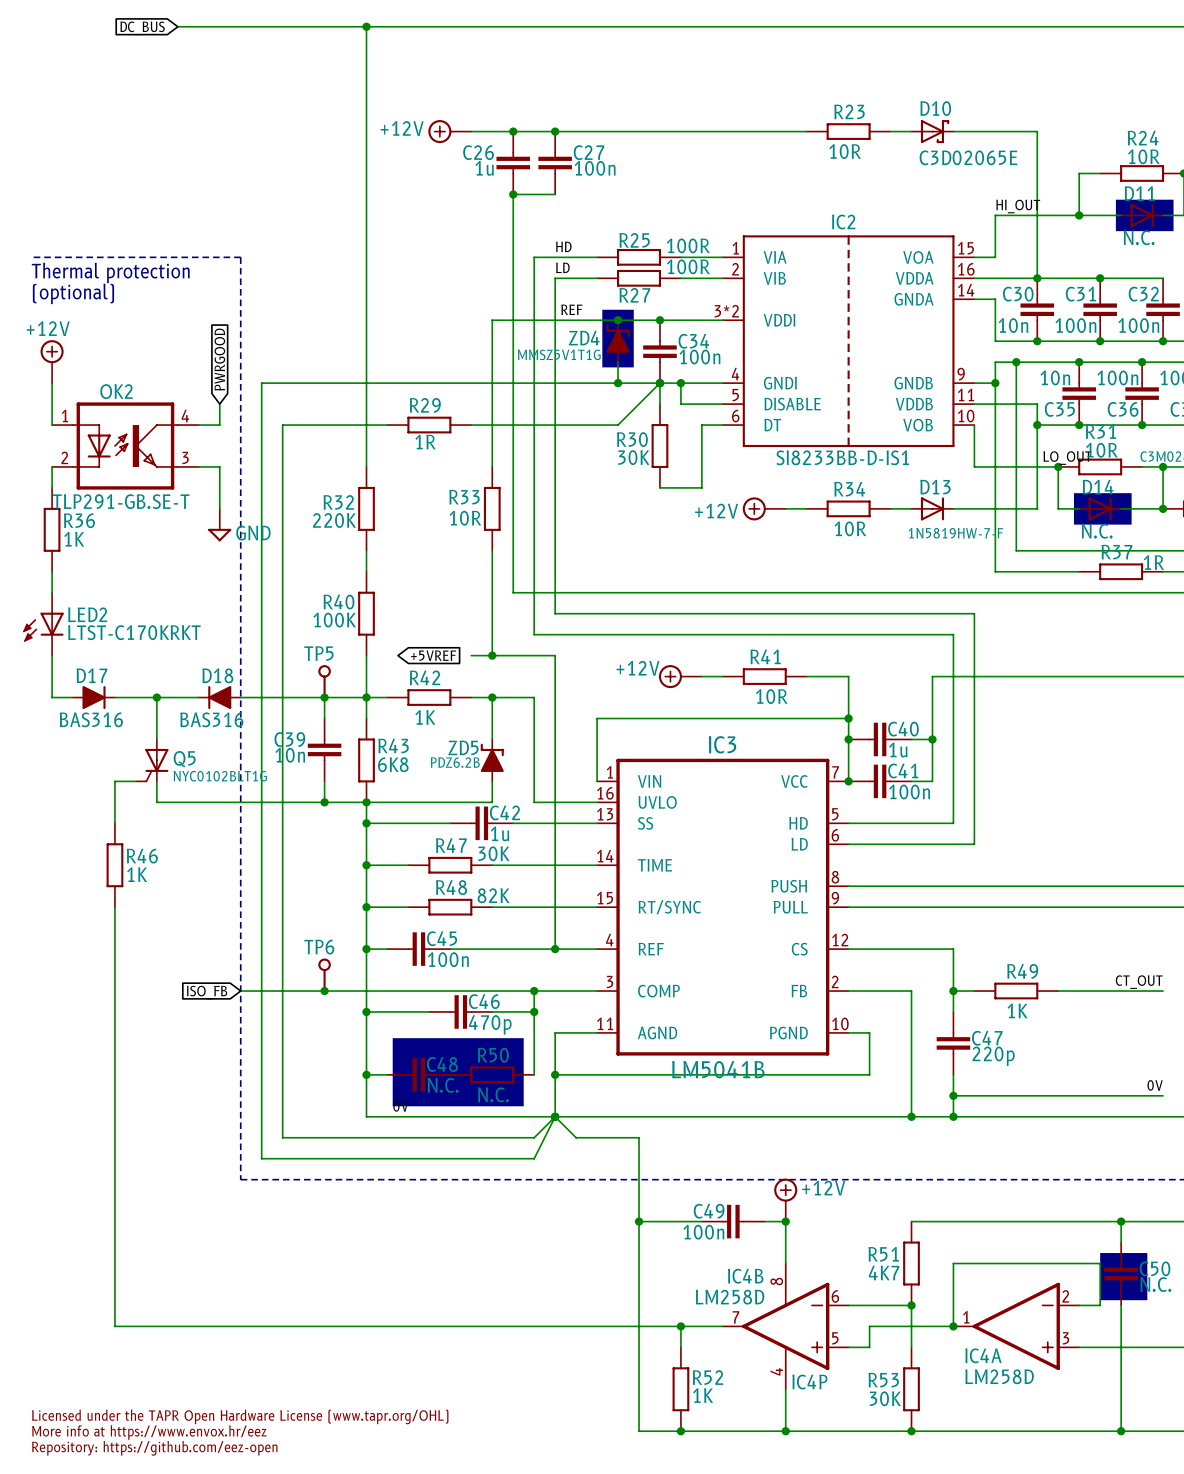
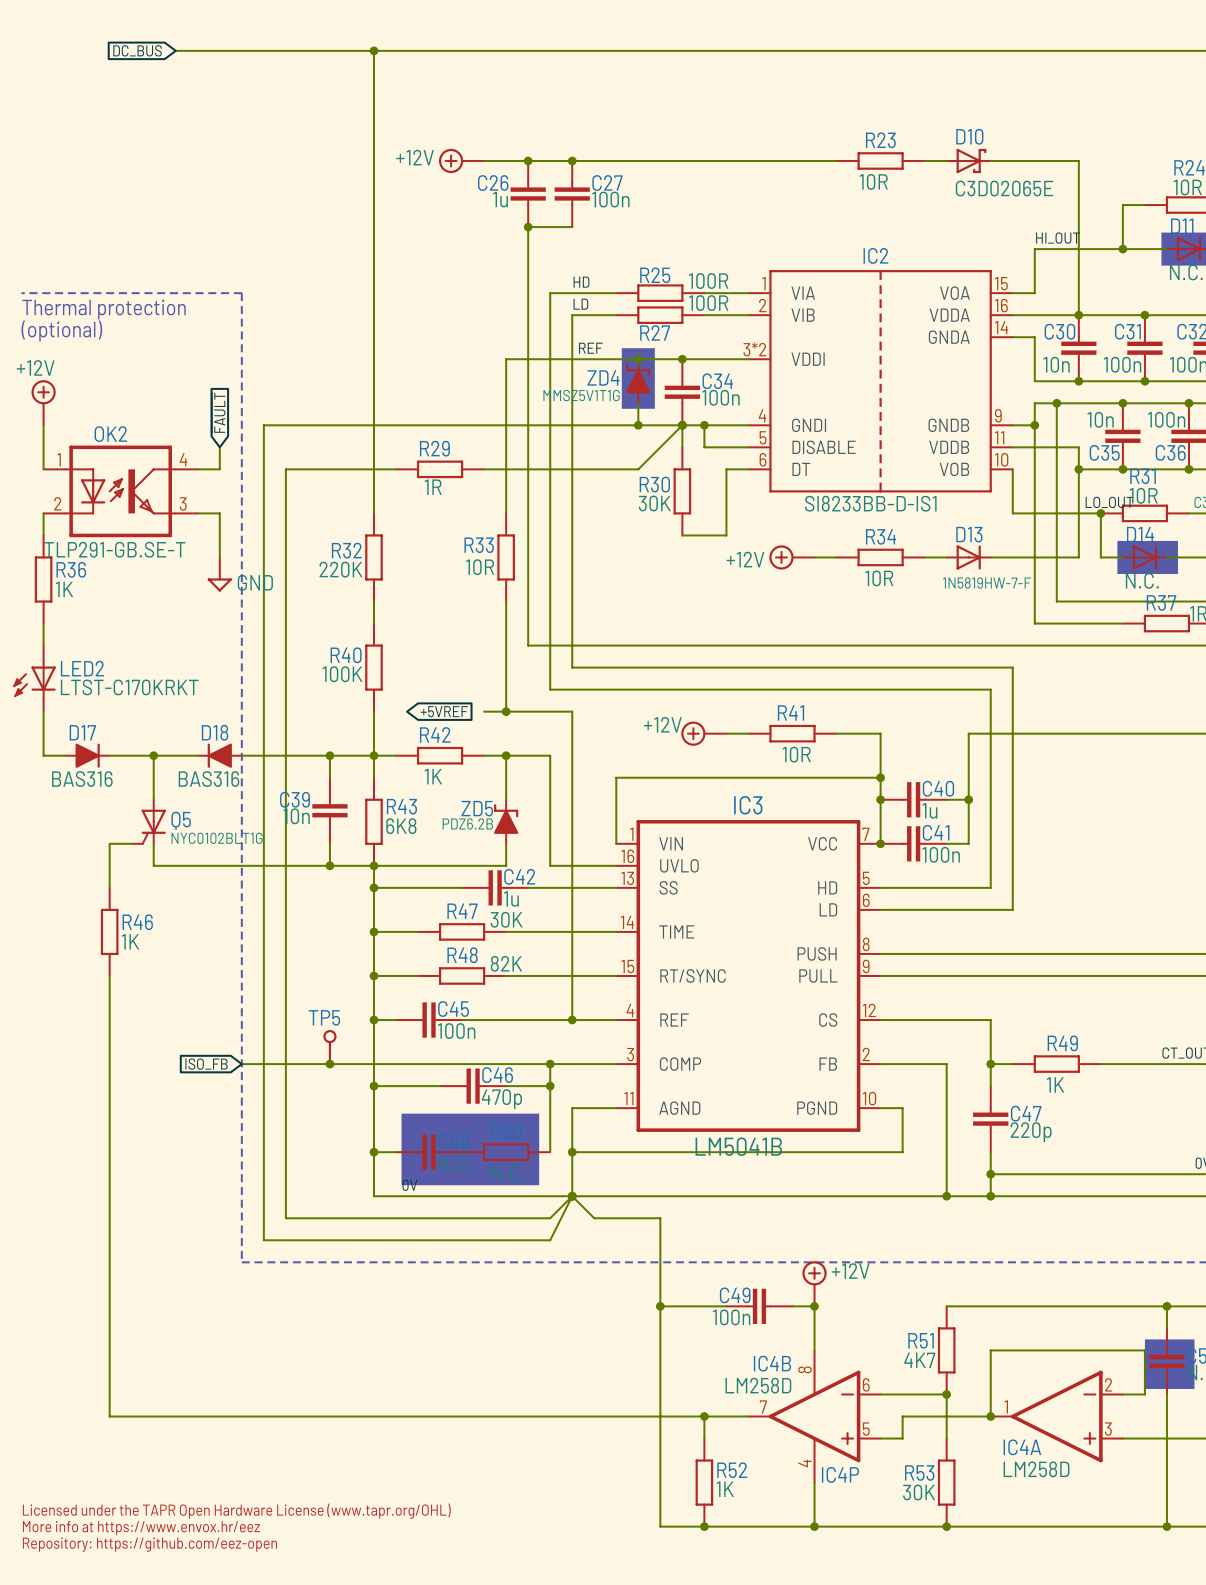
global label: PWRGOOD (219, 359) -> ~{FAULT} (218, 412)
TP5: (324, 681) -> none
TP6 name: TP6 (319, 947) -> TP5 (324, 1017)

